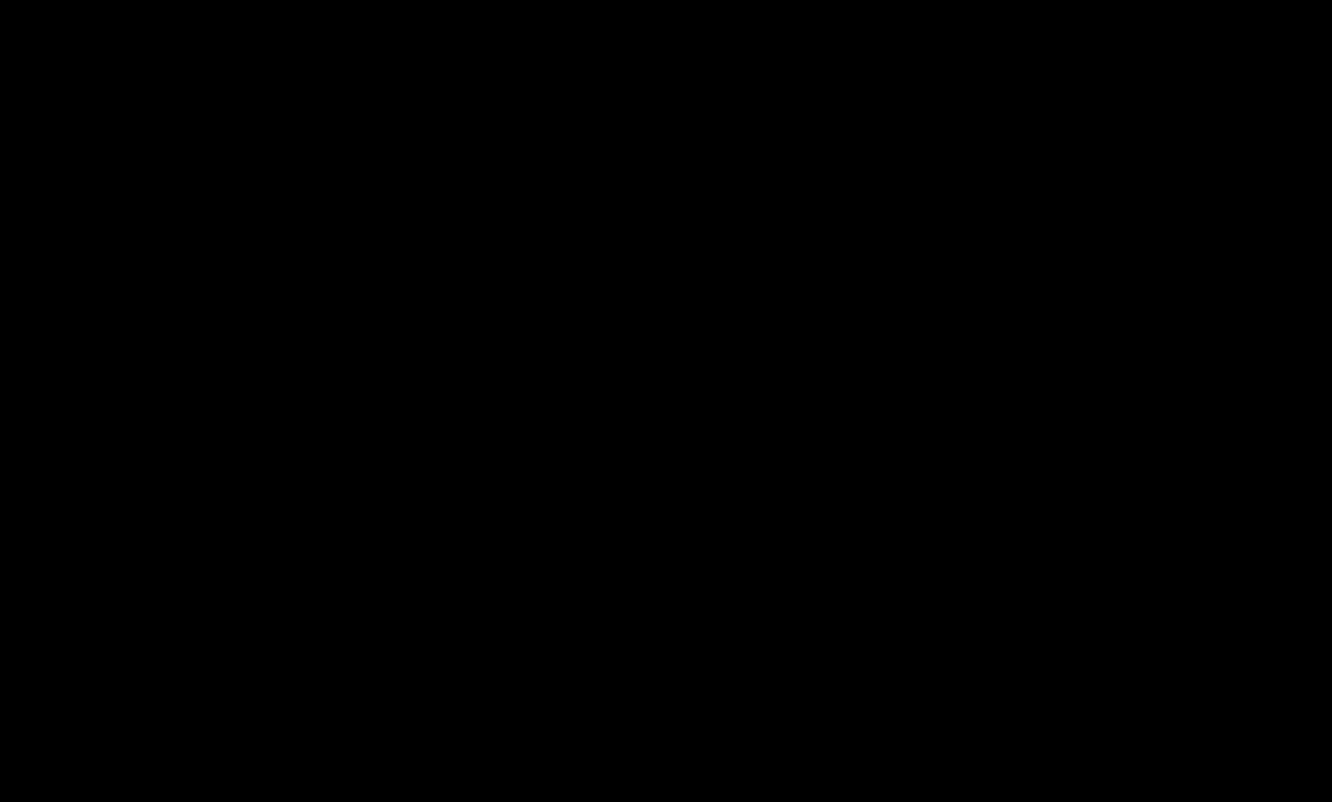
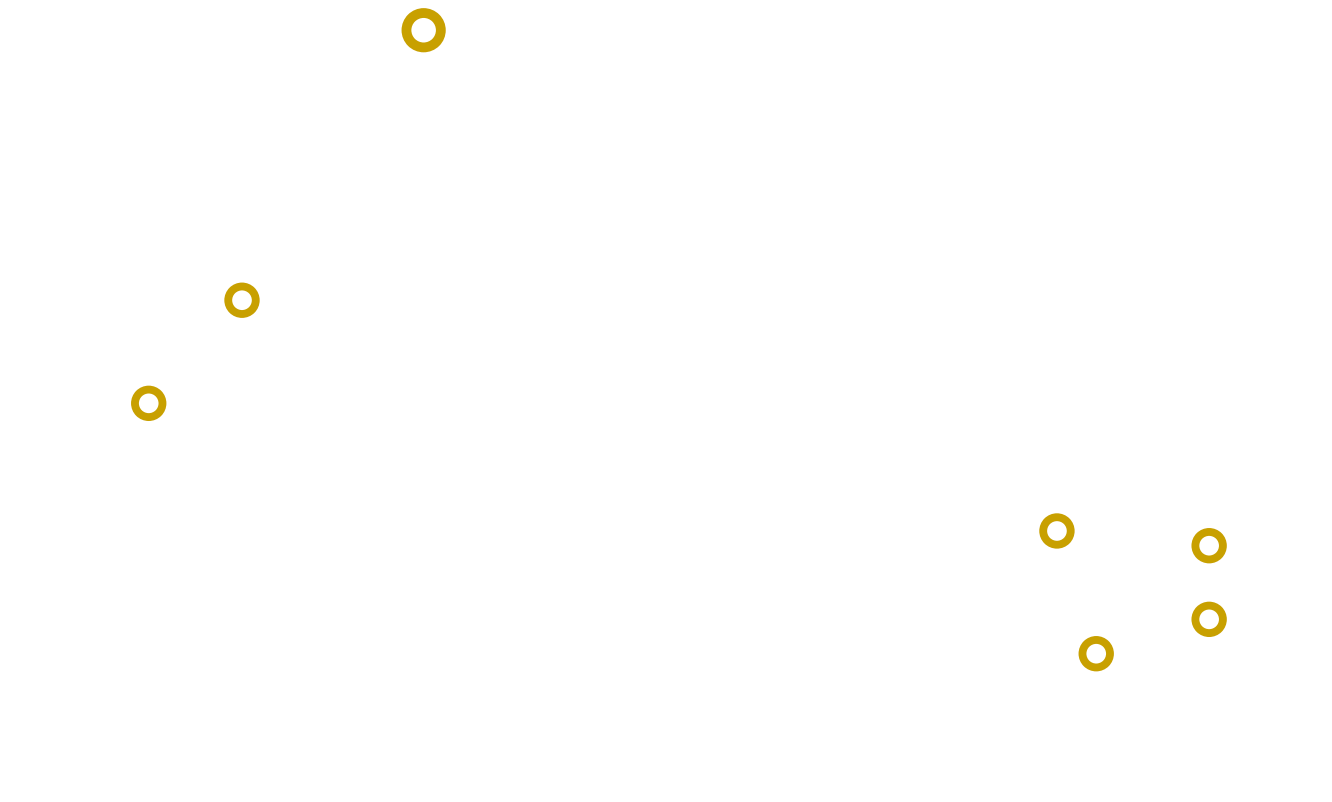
part: none -> (423, 30)
part: none -> (241, 300)
part: none -> (148, 403)
part: none -> (1056, 530)
part: none -> (1209, 545)
part: none -> (1209, 619)
part: none -> (1096, 653)

